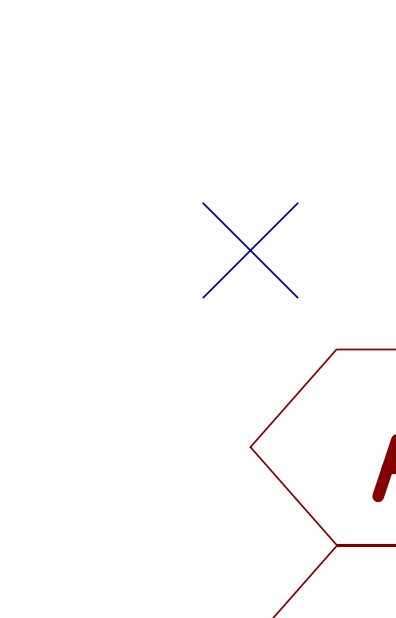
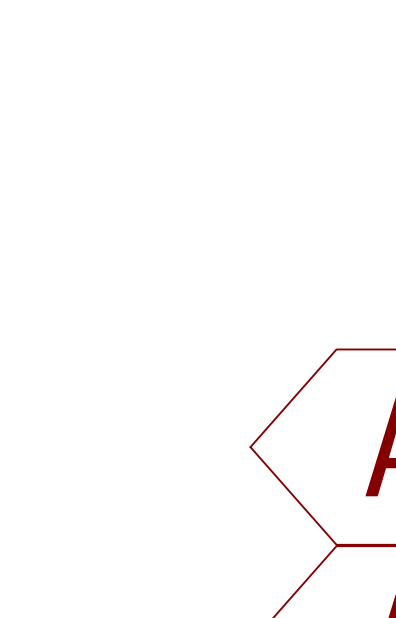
no-connect mark: (250, 250) -> none

